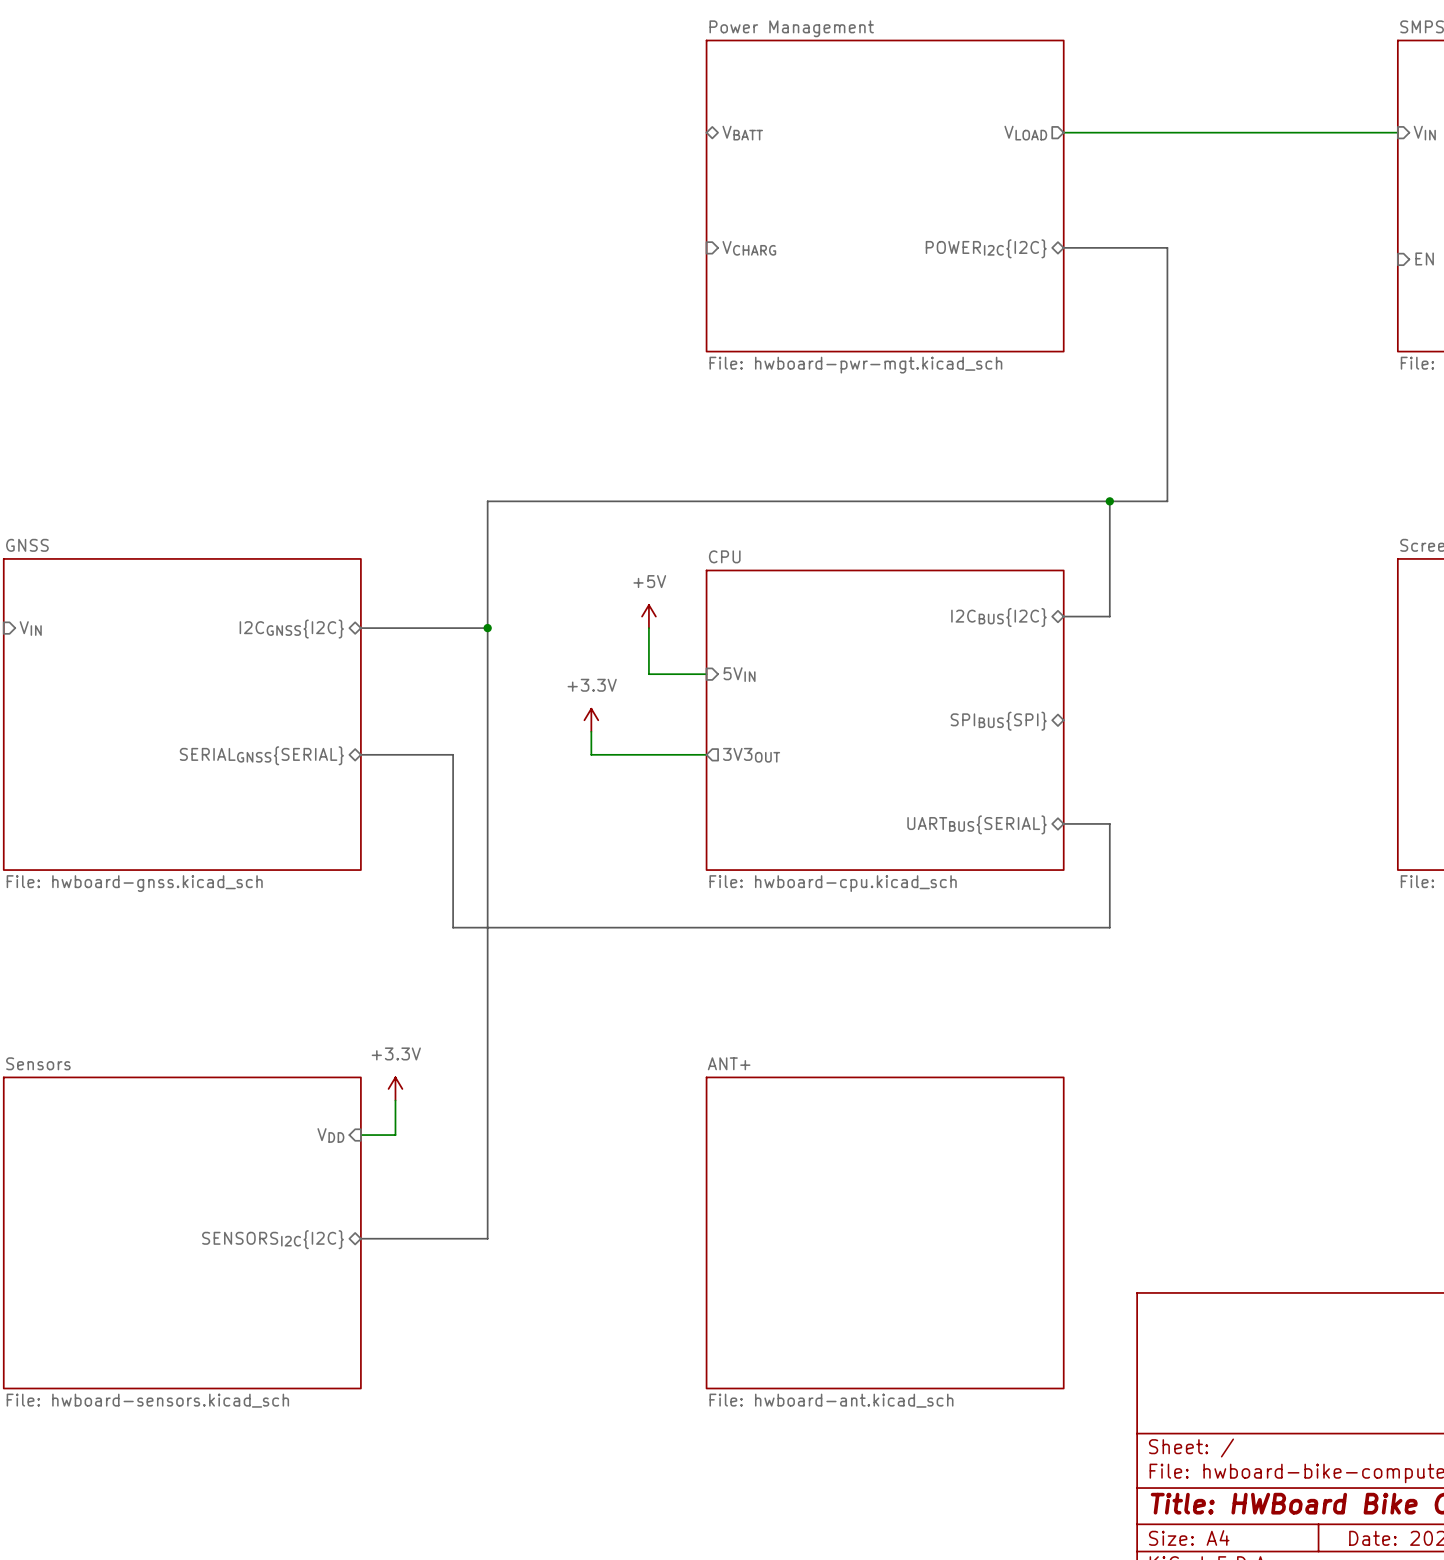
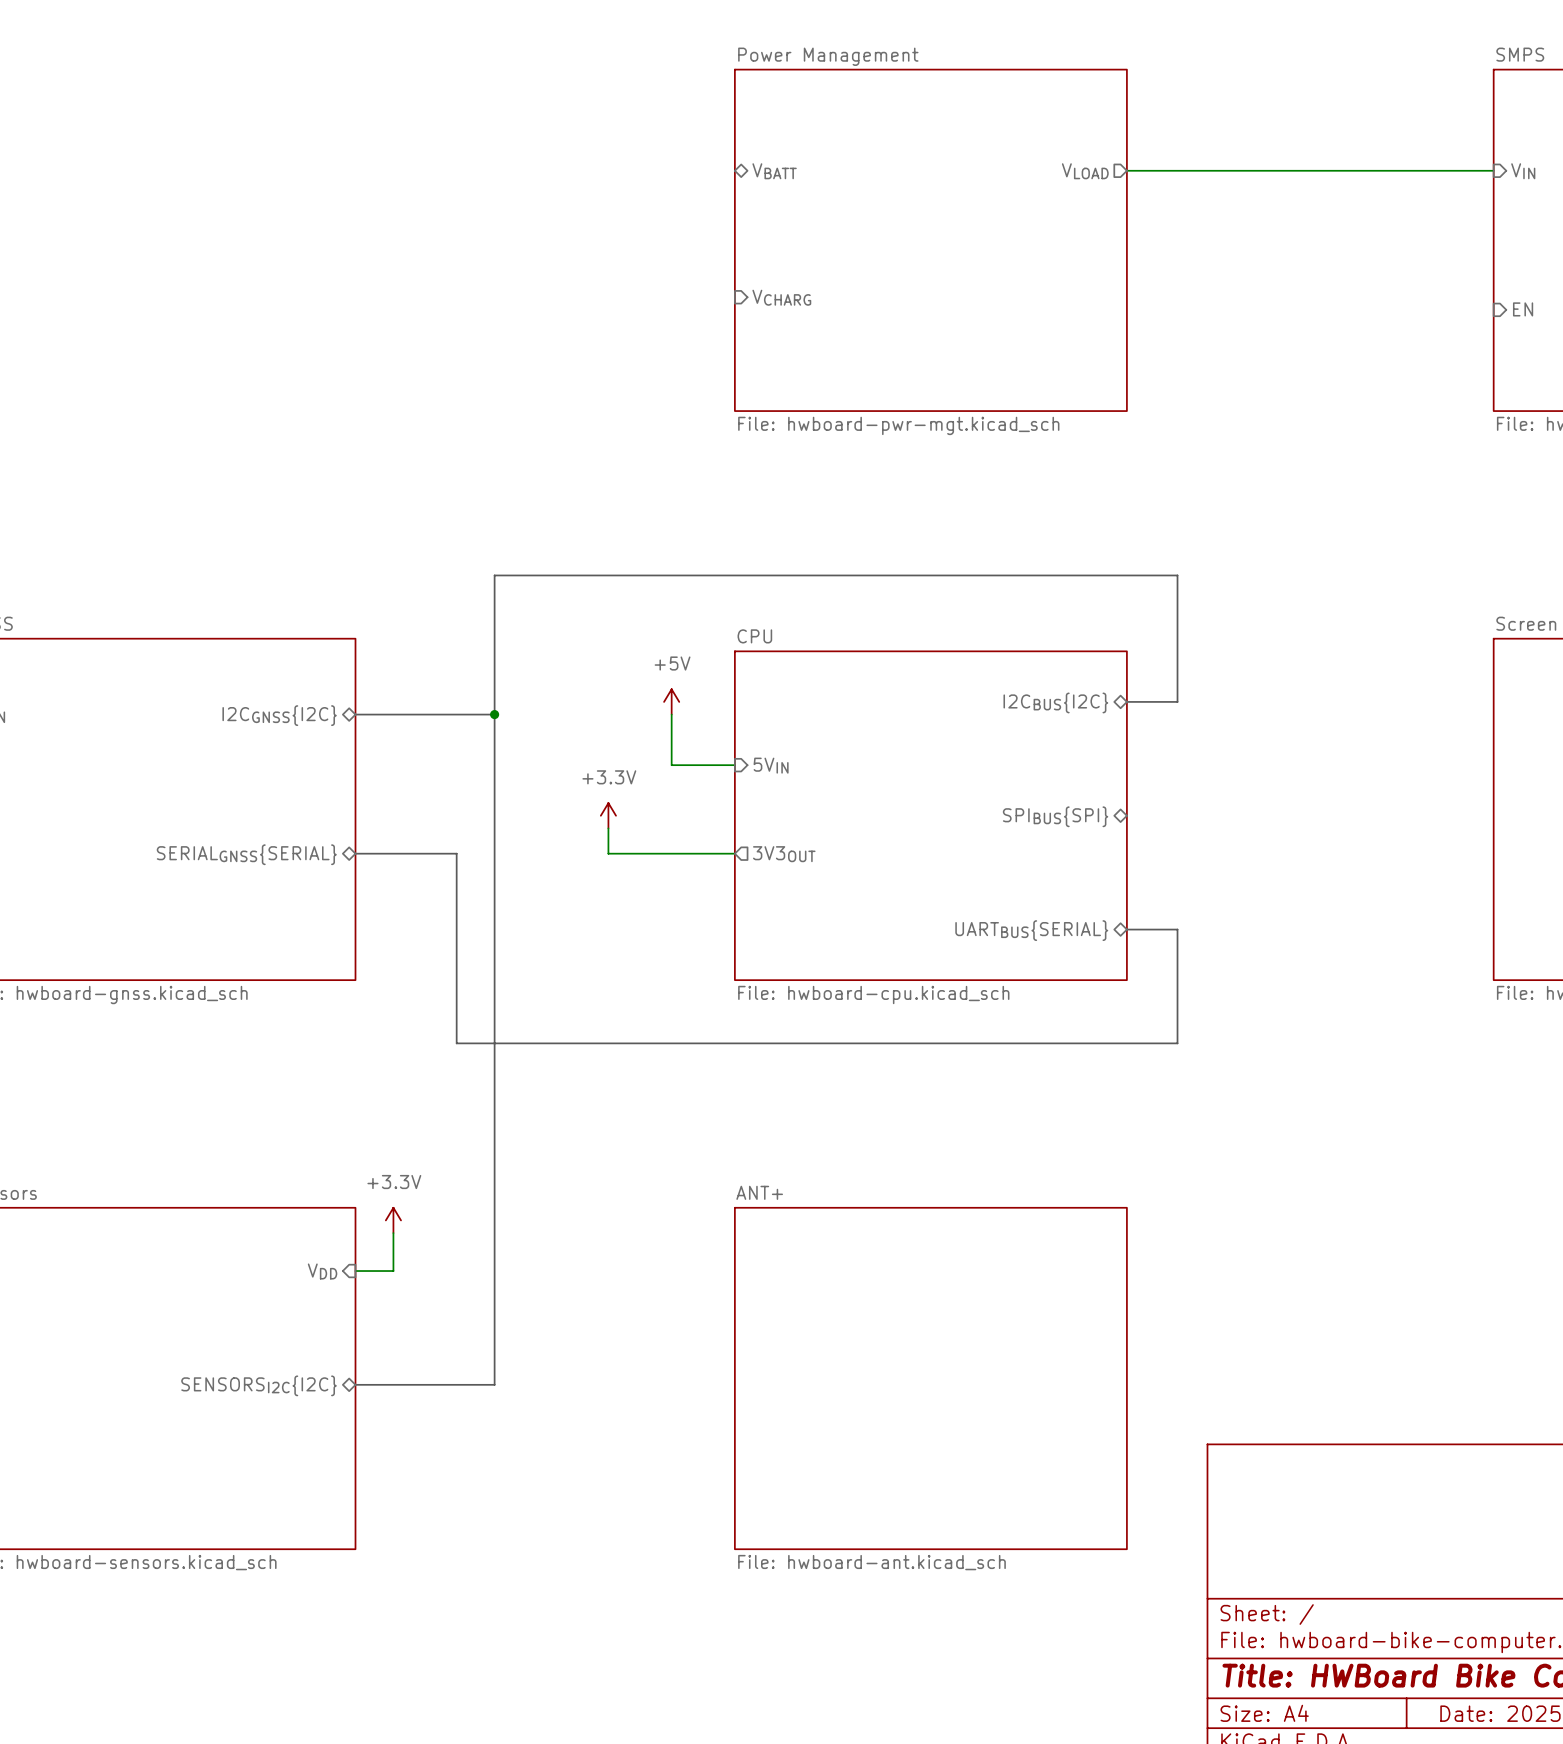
bus: (1063, 247) (1167, 247) (1167, 501) (1109, 501) -> none
sheet pin: POWERI2C{I2C} (986, 248) -> none
junction: (1109, 501) -> none

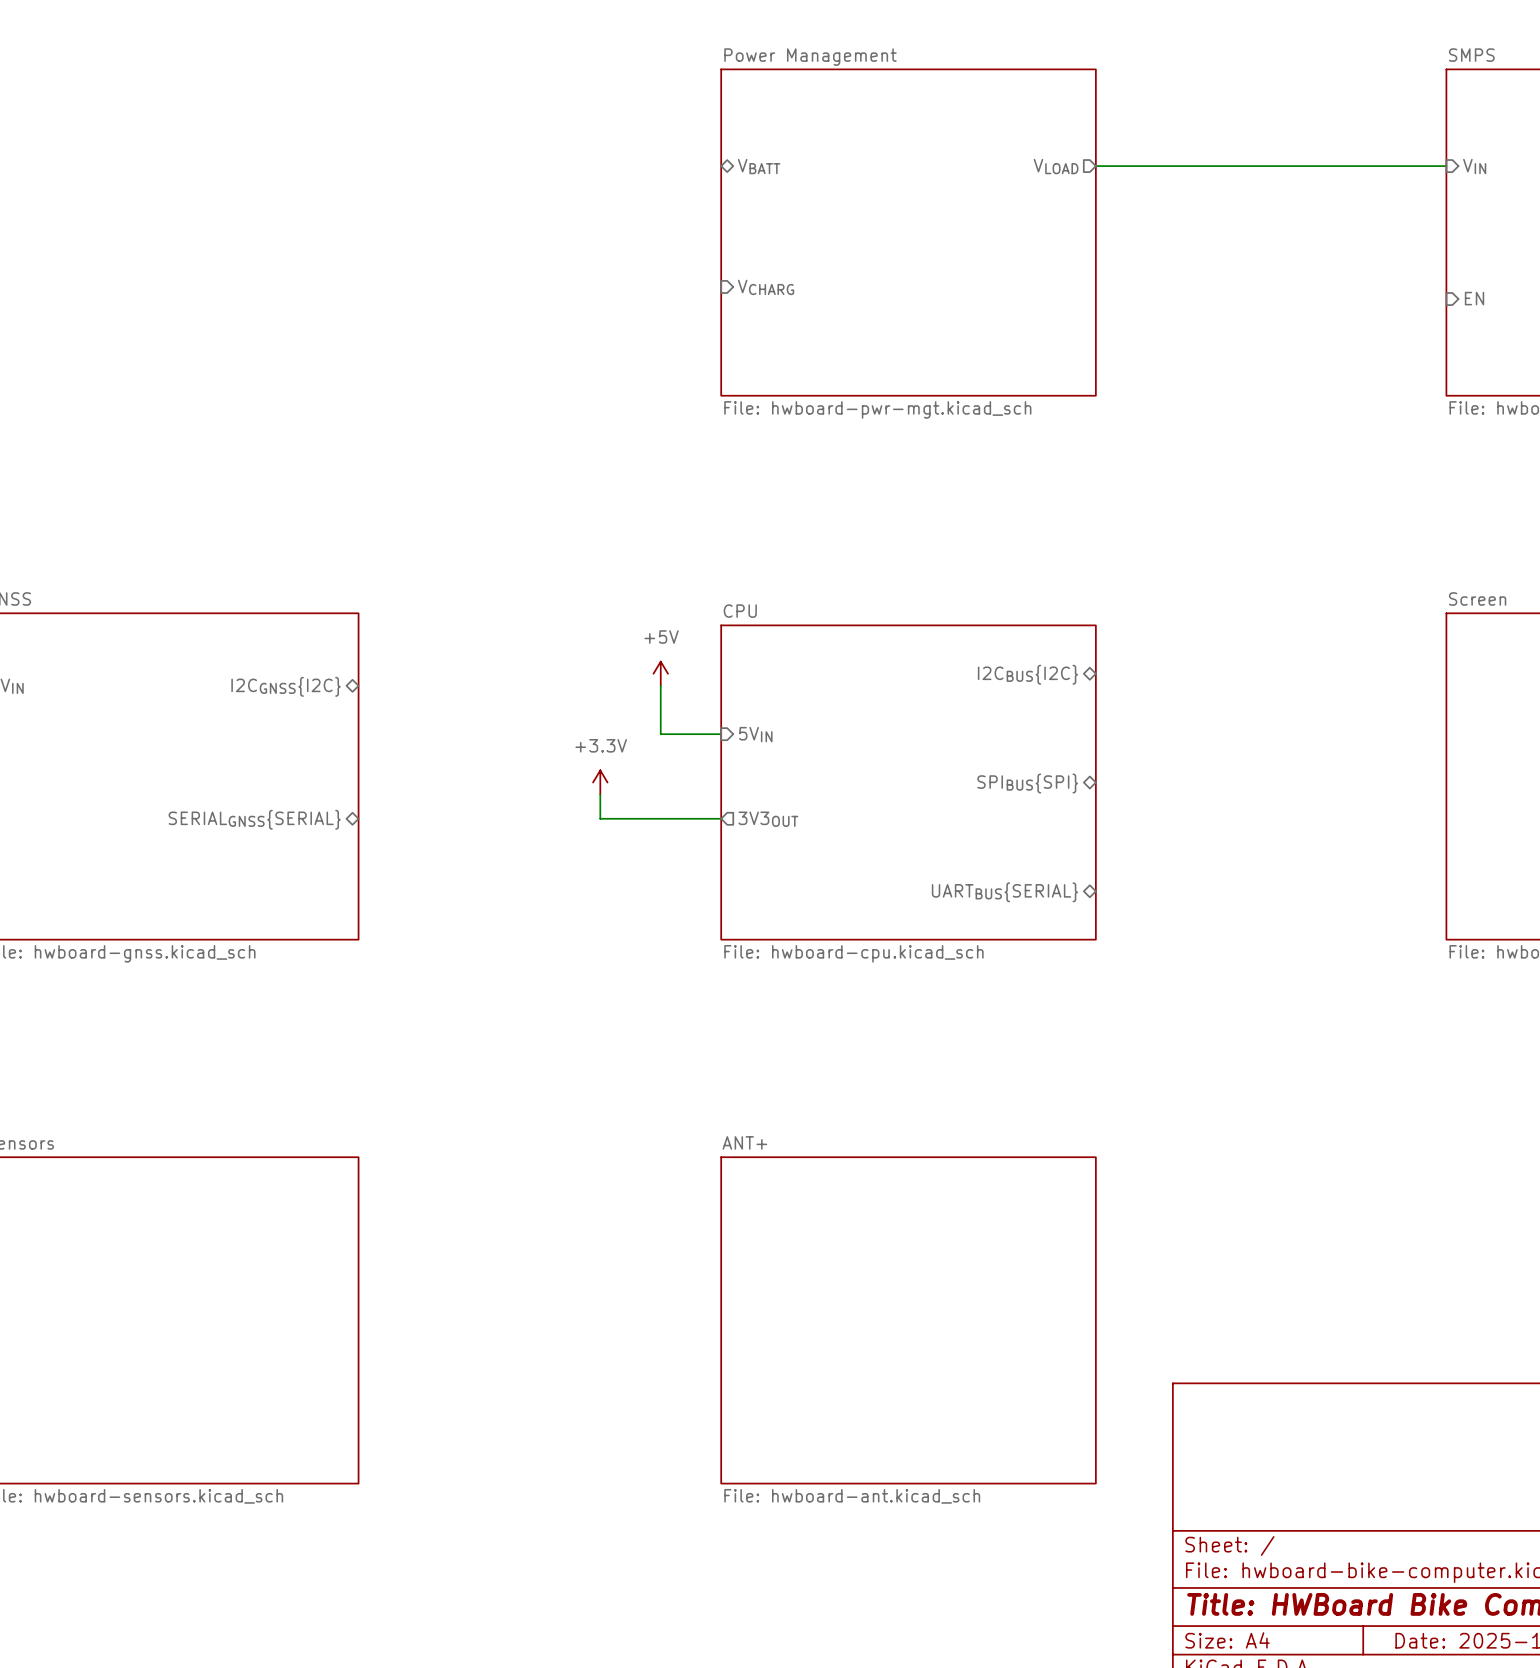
bus: (1126, 701) (1177, 701) (1177, 575) (494, 575) (494, 1384) (355, 1384) -> none
bus: (355, 714) (494, 714) -> none
junction: (494, 714) -> none
bus: (355, 853) (456, 853) (456, 1043) (1177, 1043) (1177, 929) (1126, 929) -> none
power symbol: +3.3V (393, 1220) -> none
wire: (393, 1233) (393, 1271) (355, 1271) -> none
sheet pin: VDD (322, 1271) -> none
sheet pin: SENSORSI2C{I2C} (259, 1385) -> none

